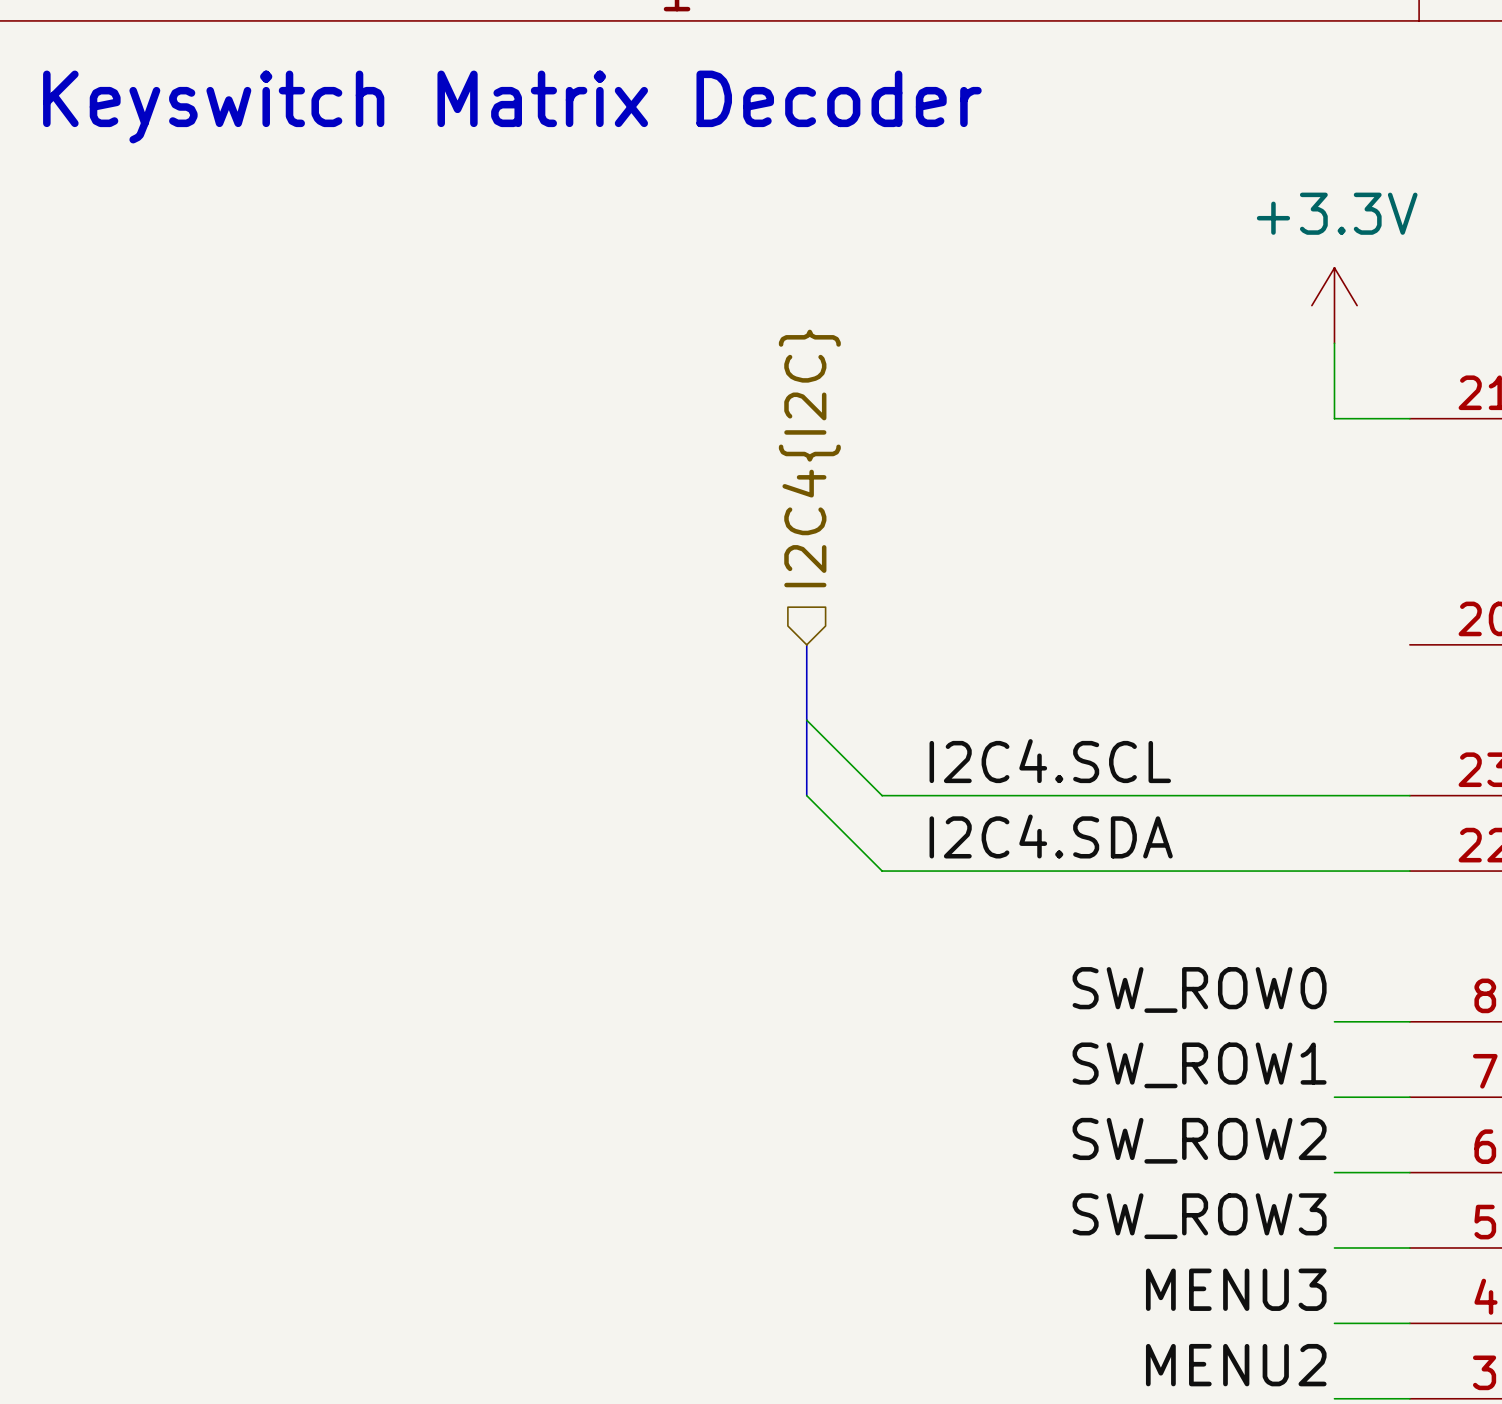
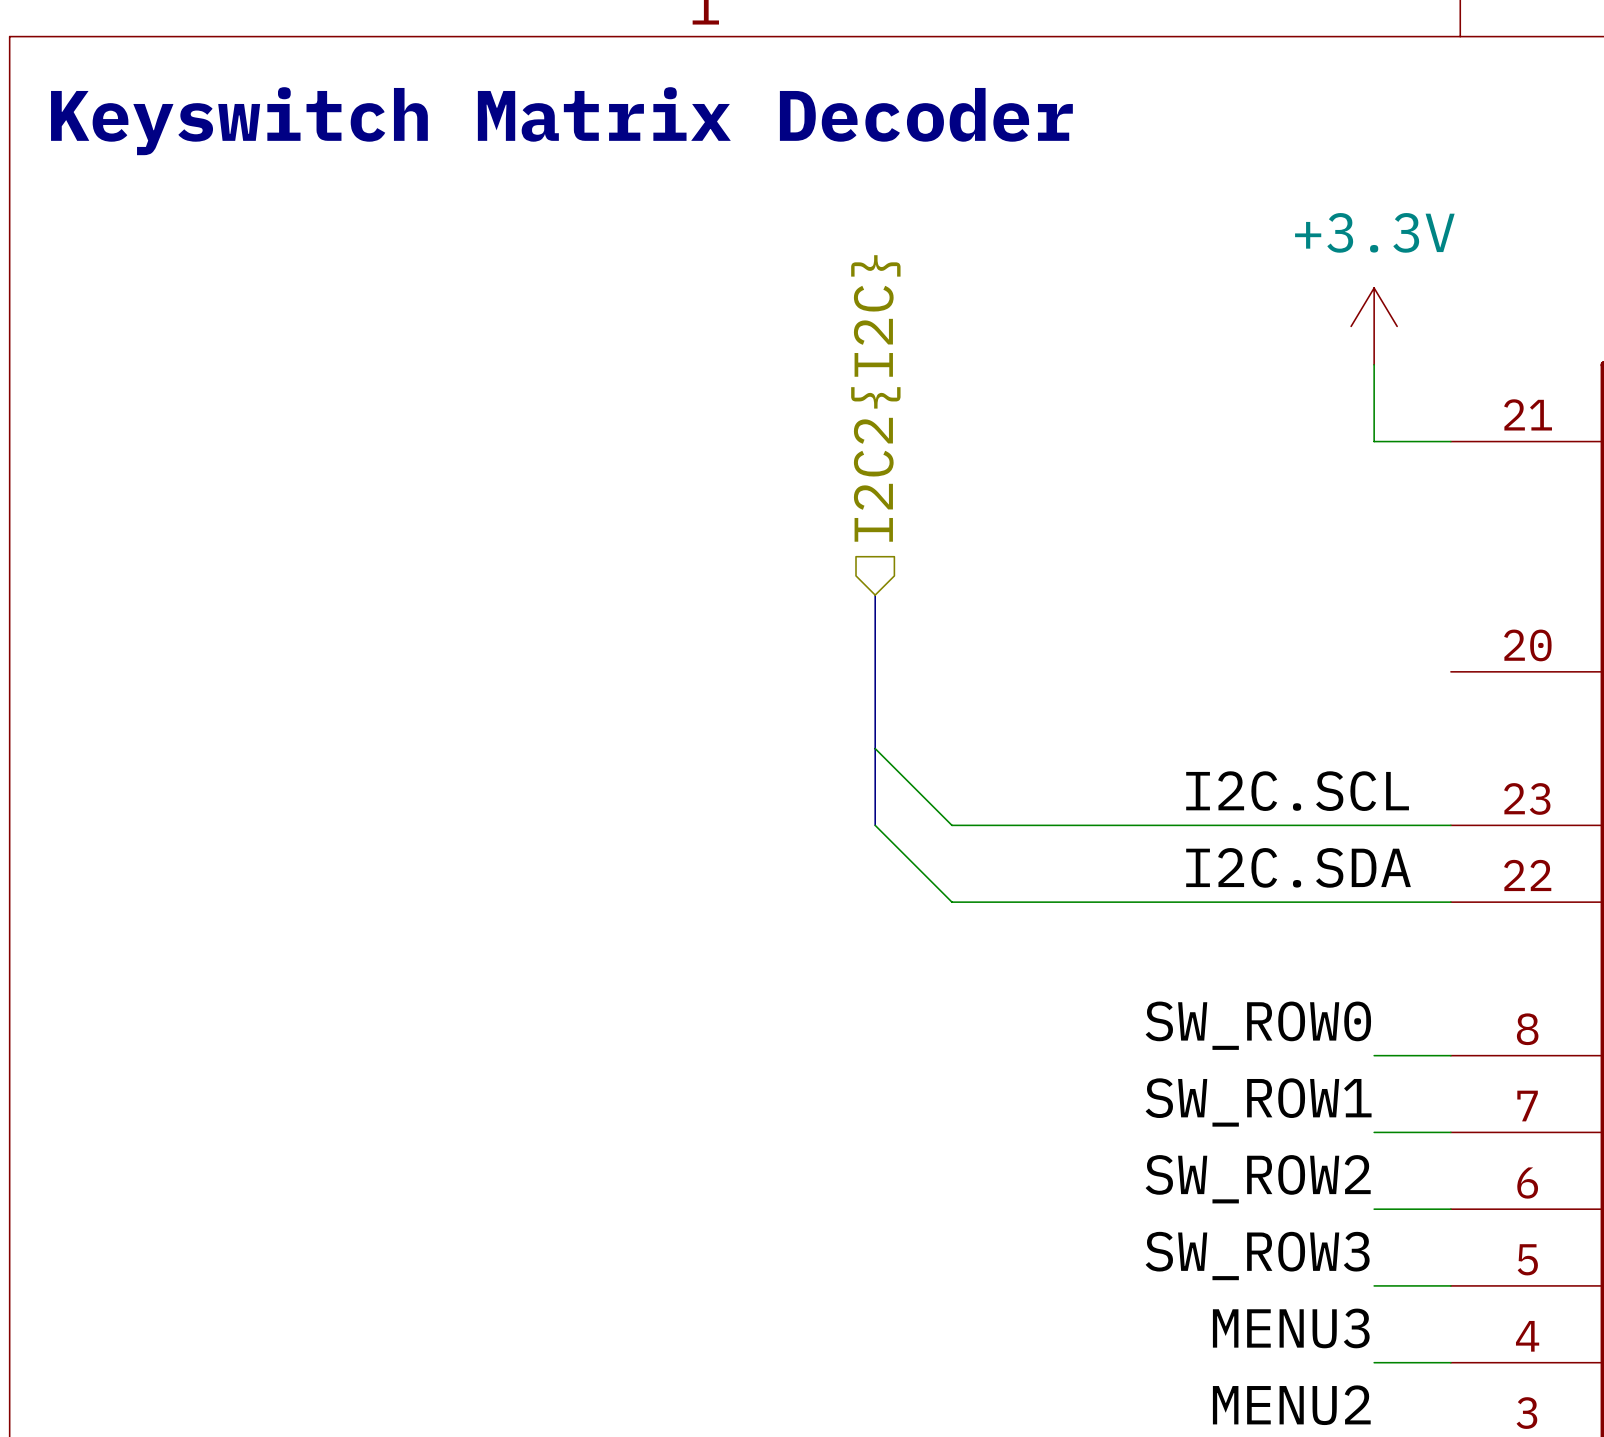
hierarchical label: I2C4{I2C} (809, 458) -> I2C2{I2C} (875, 398)
bus: none -> (875, 595) (875, 825)
bus: (806, 644) (806, 795) -> none
wire: (806, 720) (882, 795) (919, 795) -> (875, 748) (951, 825)
label: I2C4.SCL (1050, 761) -> none
label: none -> I2C.SCL (1297, 791)
wire: (806, 795) (882, 871) (919, 871) -> (875, 825) (951, 902)
label: I2C4.SDA (1051, 836) -> none
label: none -> I2C.SDA (1298, 867)

